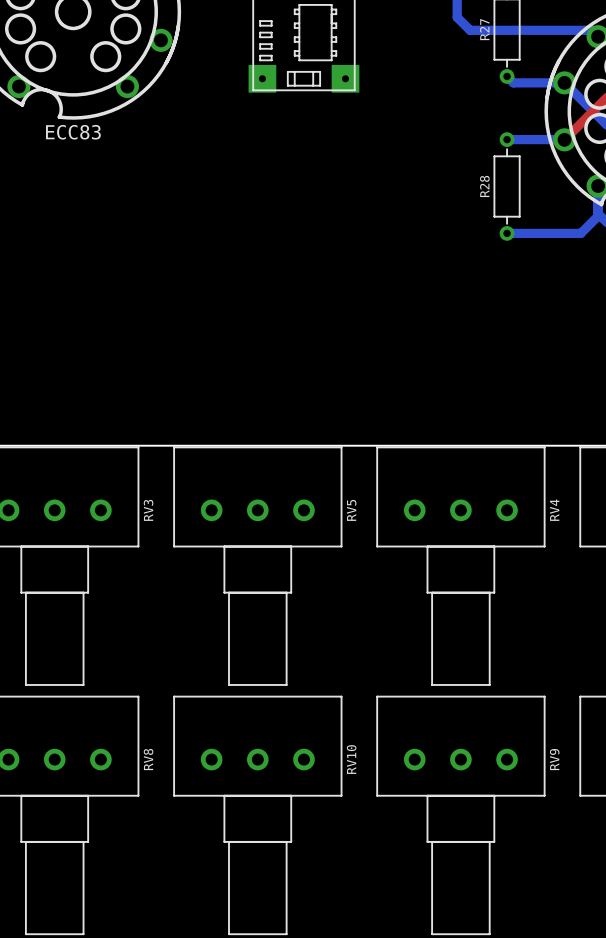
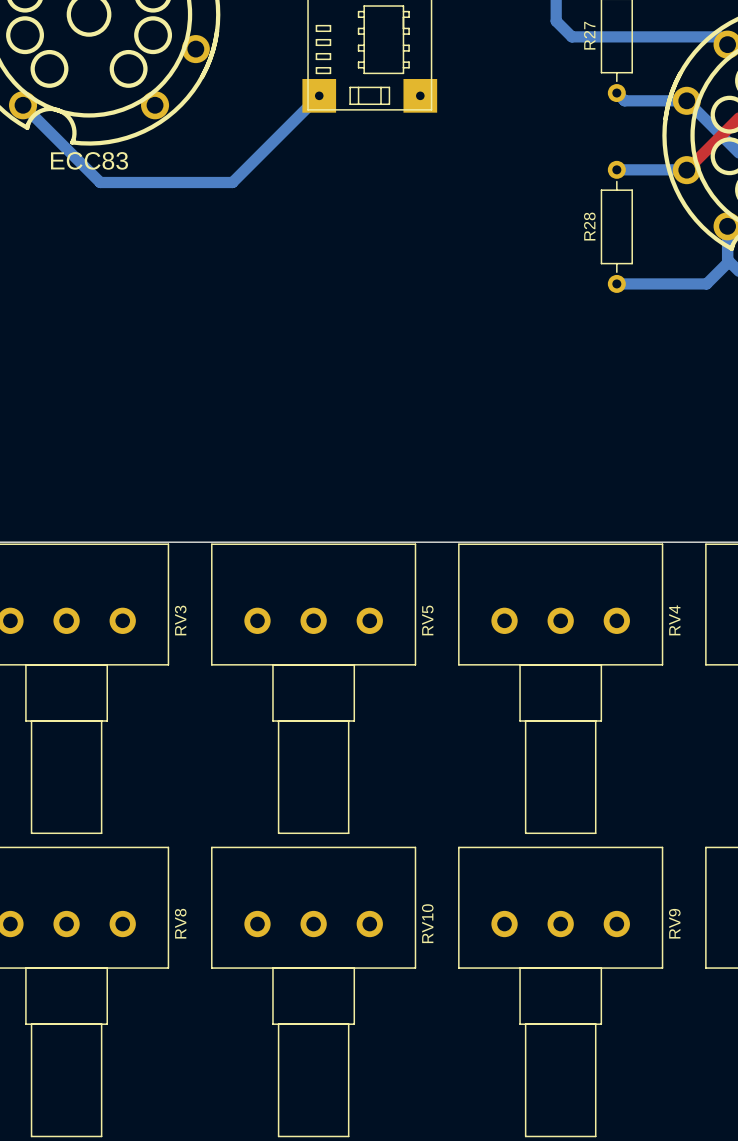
bottom track: none -> (319, 95) (232, 182) (100, 182) (23, 105)

